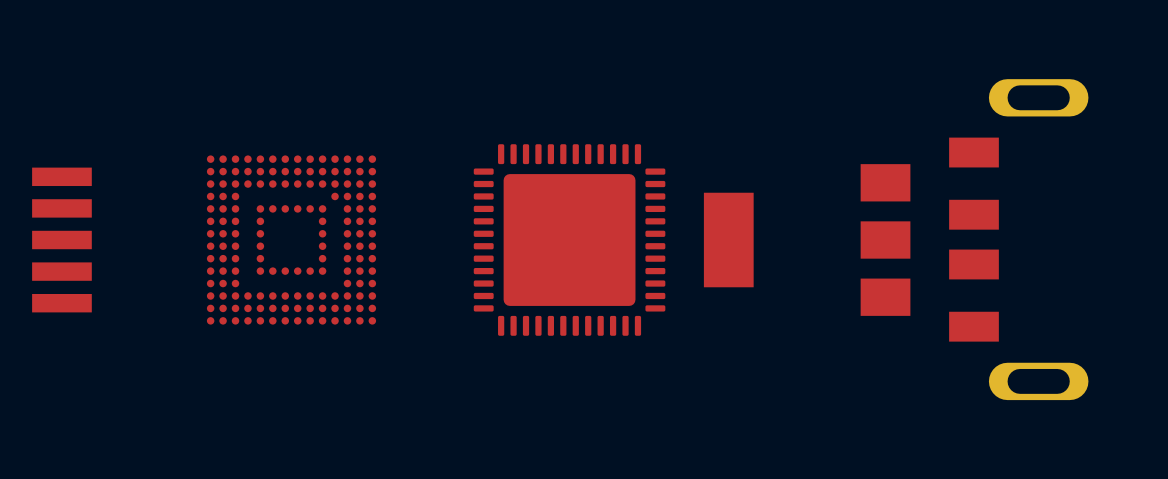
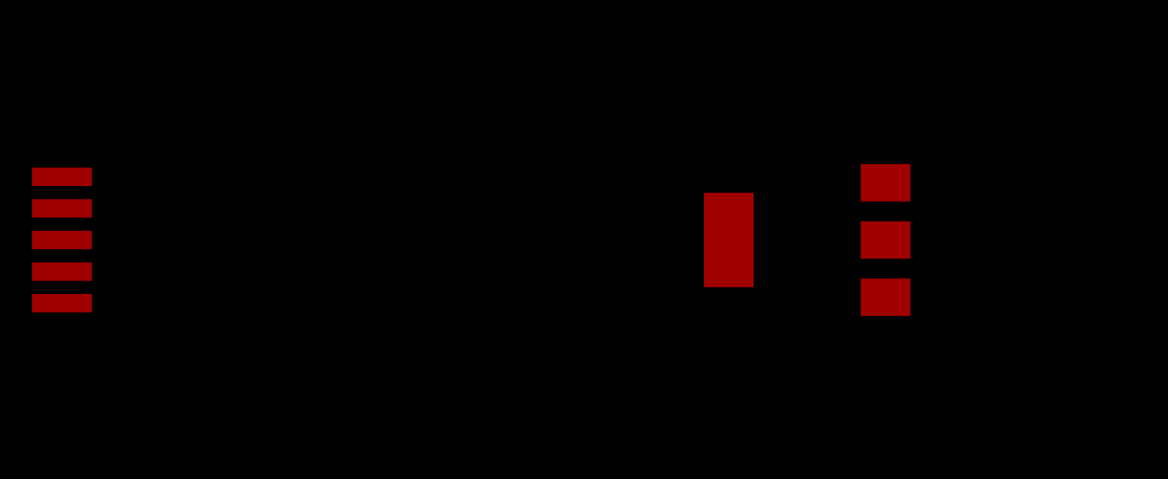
part: (1018, 239) -> none
part: (291, 240) -> none
part: (569, 240) -> none

